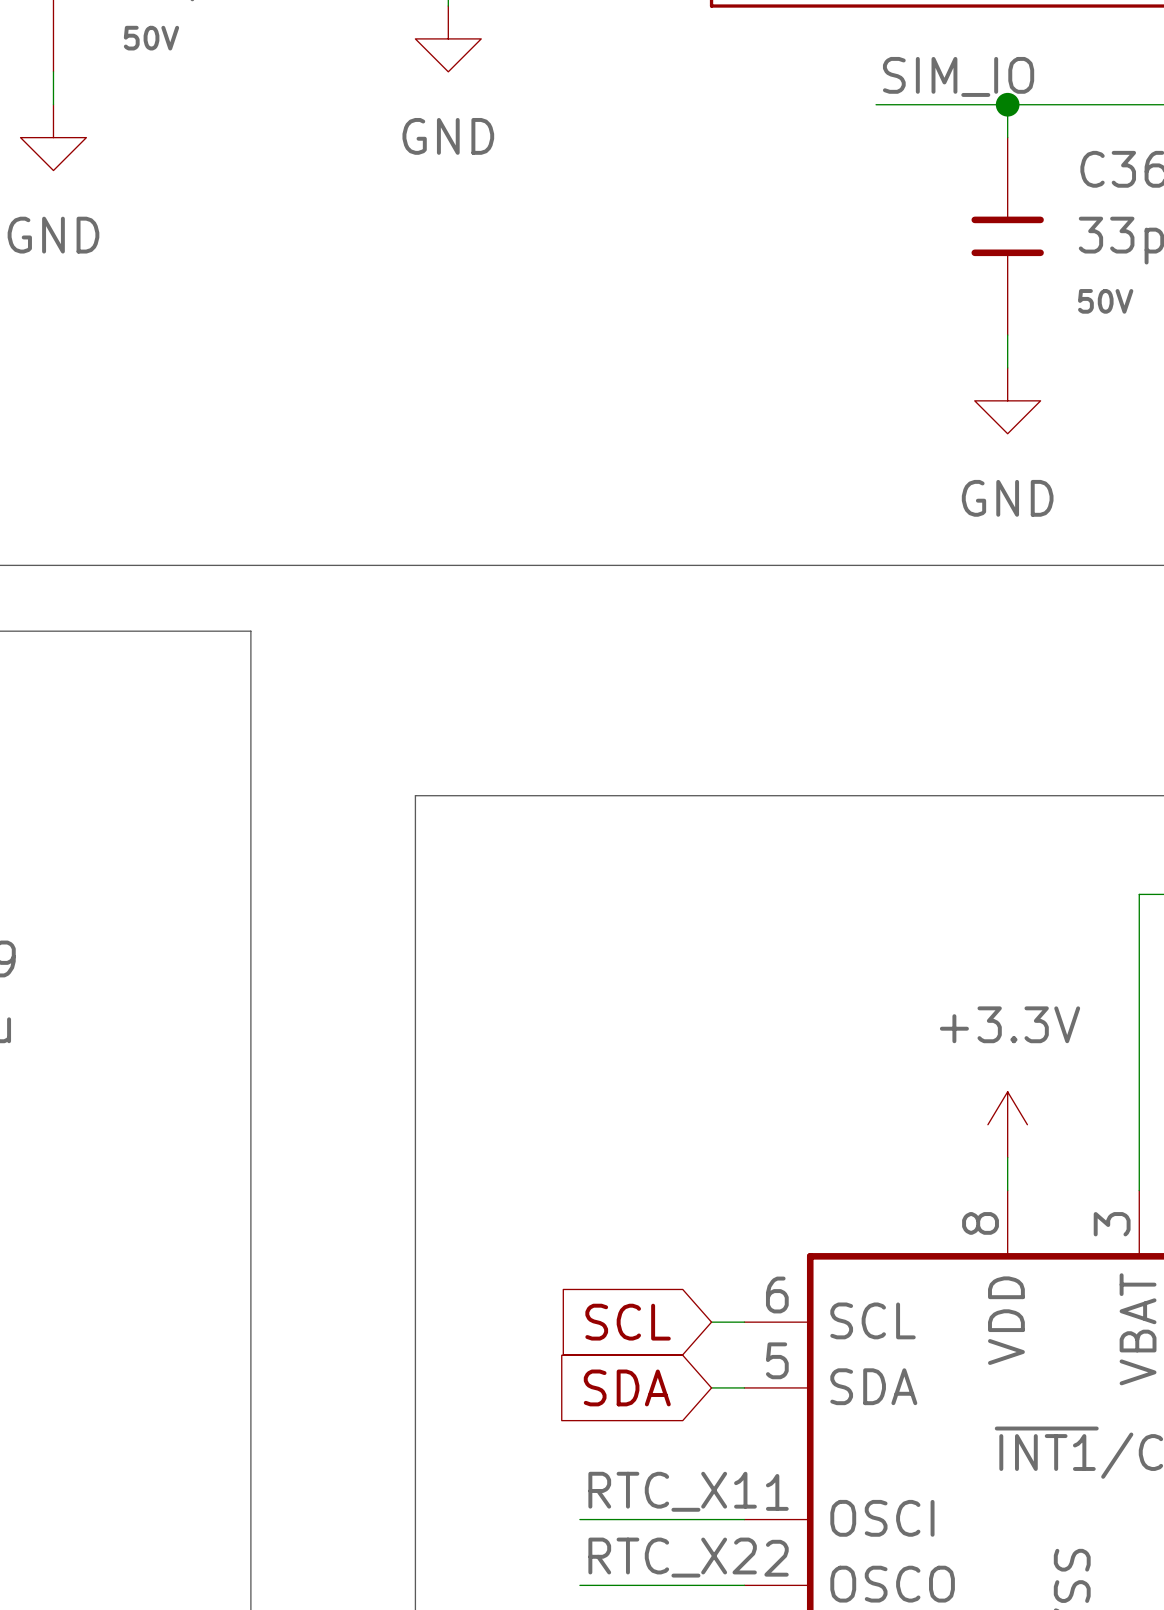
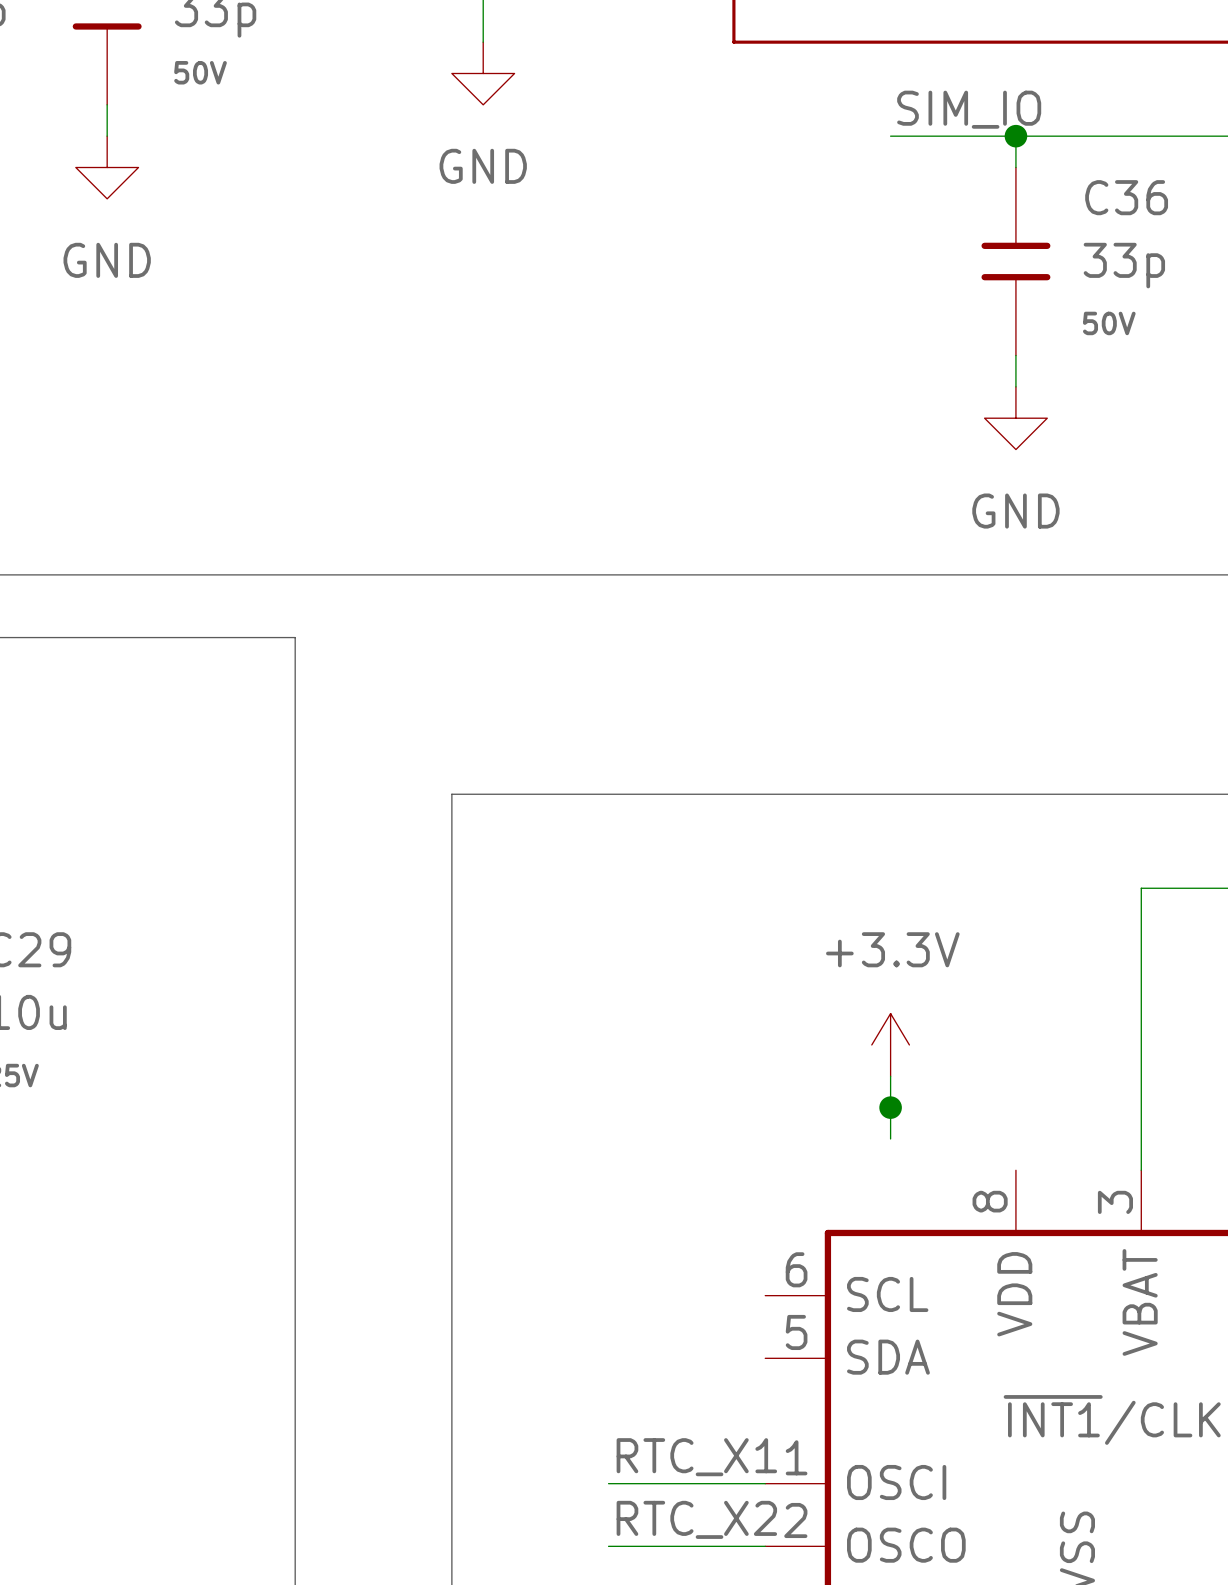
wire: none -> (890, 1076) (890, 1138)
junction: none -> (890, 1107)
power symbol position: +3.3V (1007, 1124) -> +3.3V (890, 1044)
wire: (1007, 1157) (1007, 1190) -> none
global label: SCL (628, 1322) -> none
wire: (711, 1322) (744, 1322) -> none
global label: SDA (627, 1387) -> none
wire: (711, 1387) (744, 1387) -> none

